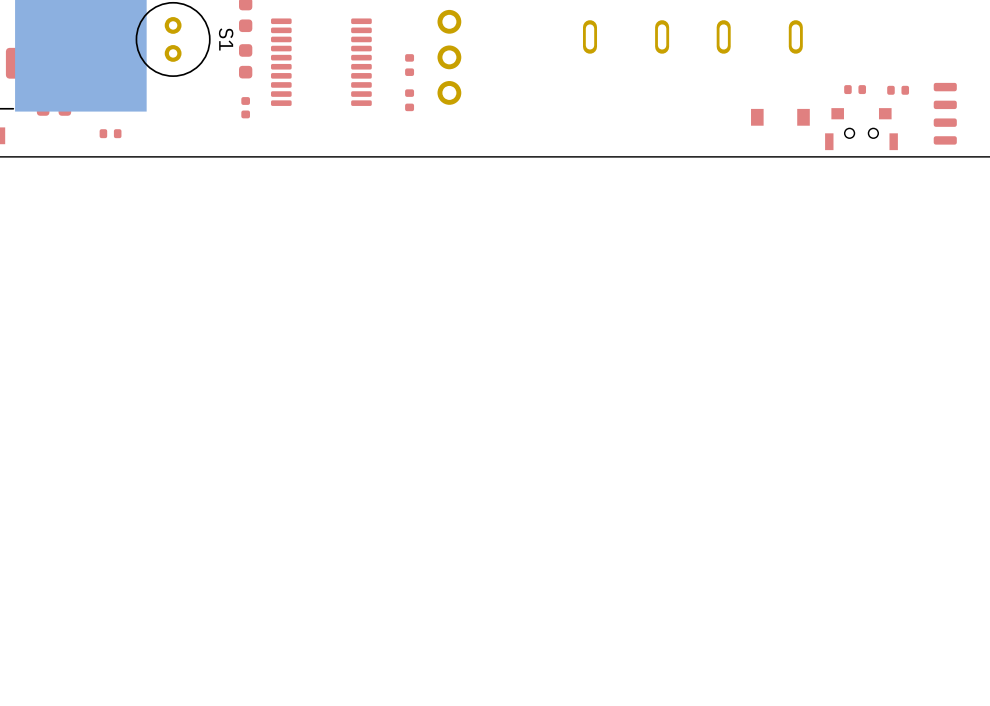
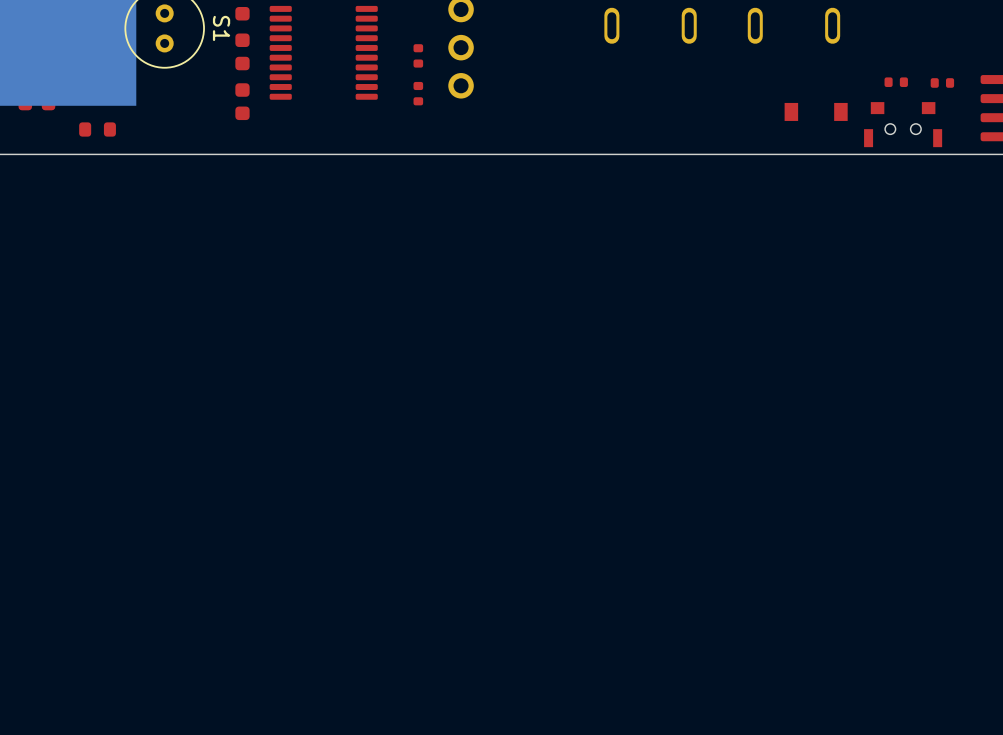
part footprint: [241, 97, 250, 119] -> [235, 83, 250, 121]
part footprint: [99, 129, 122, 139] -> [79, 122, 116, 137]

